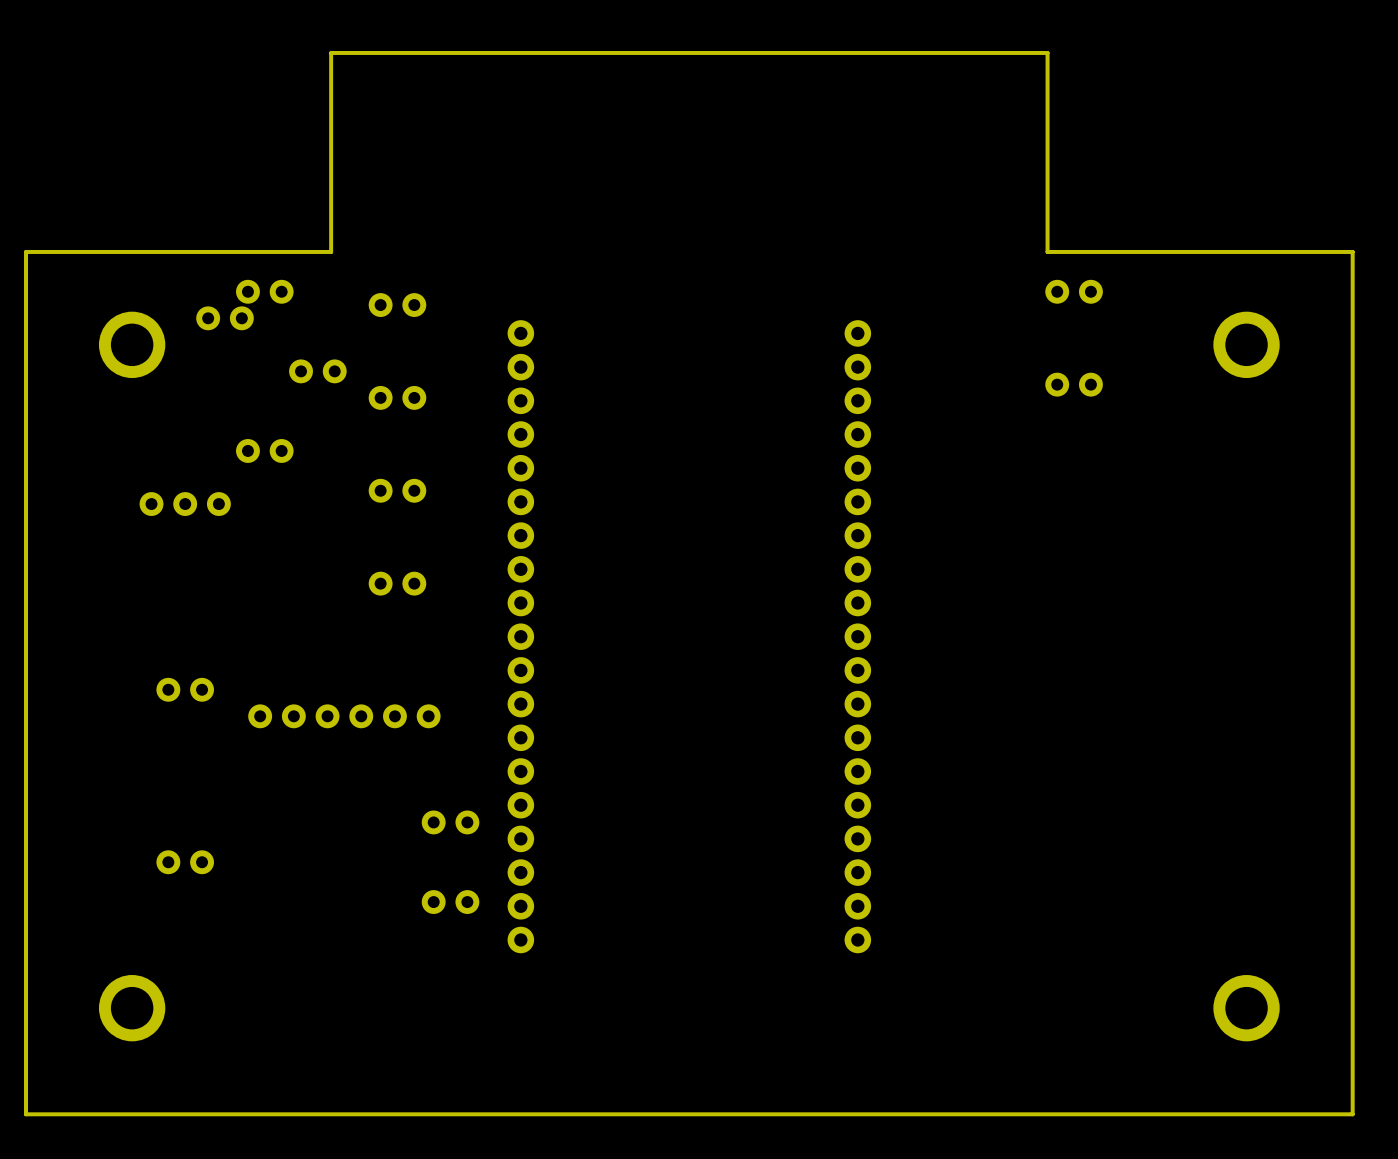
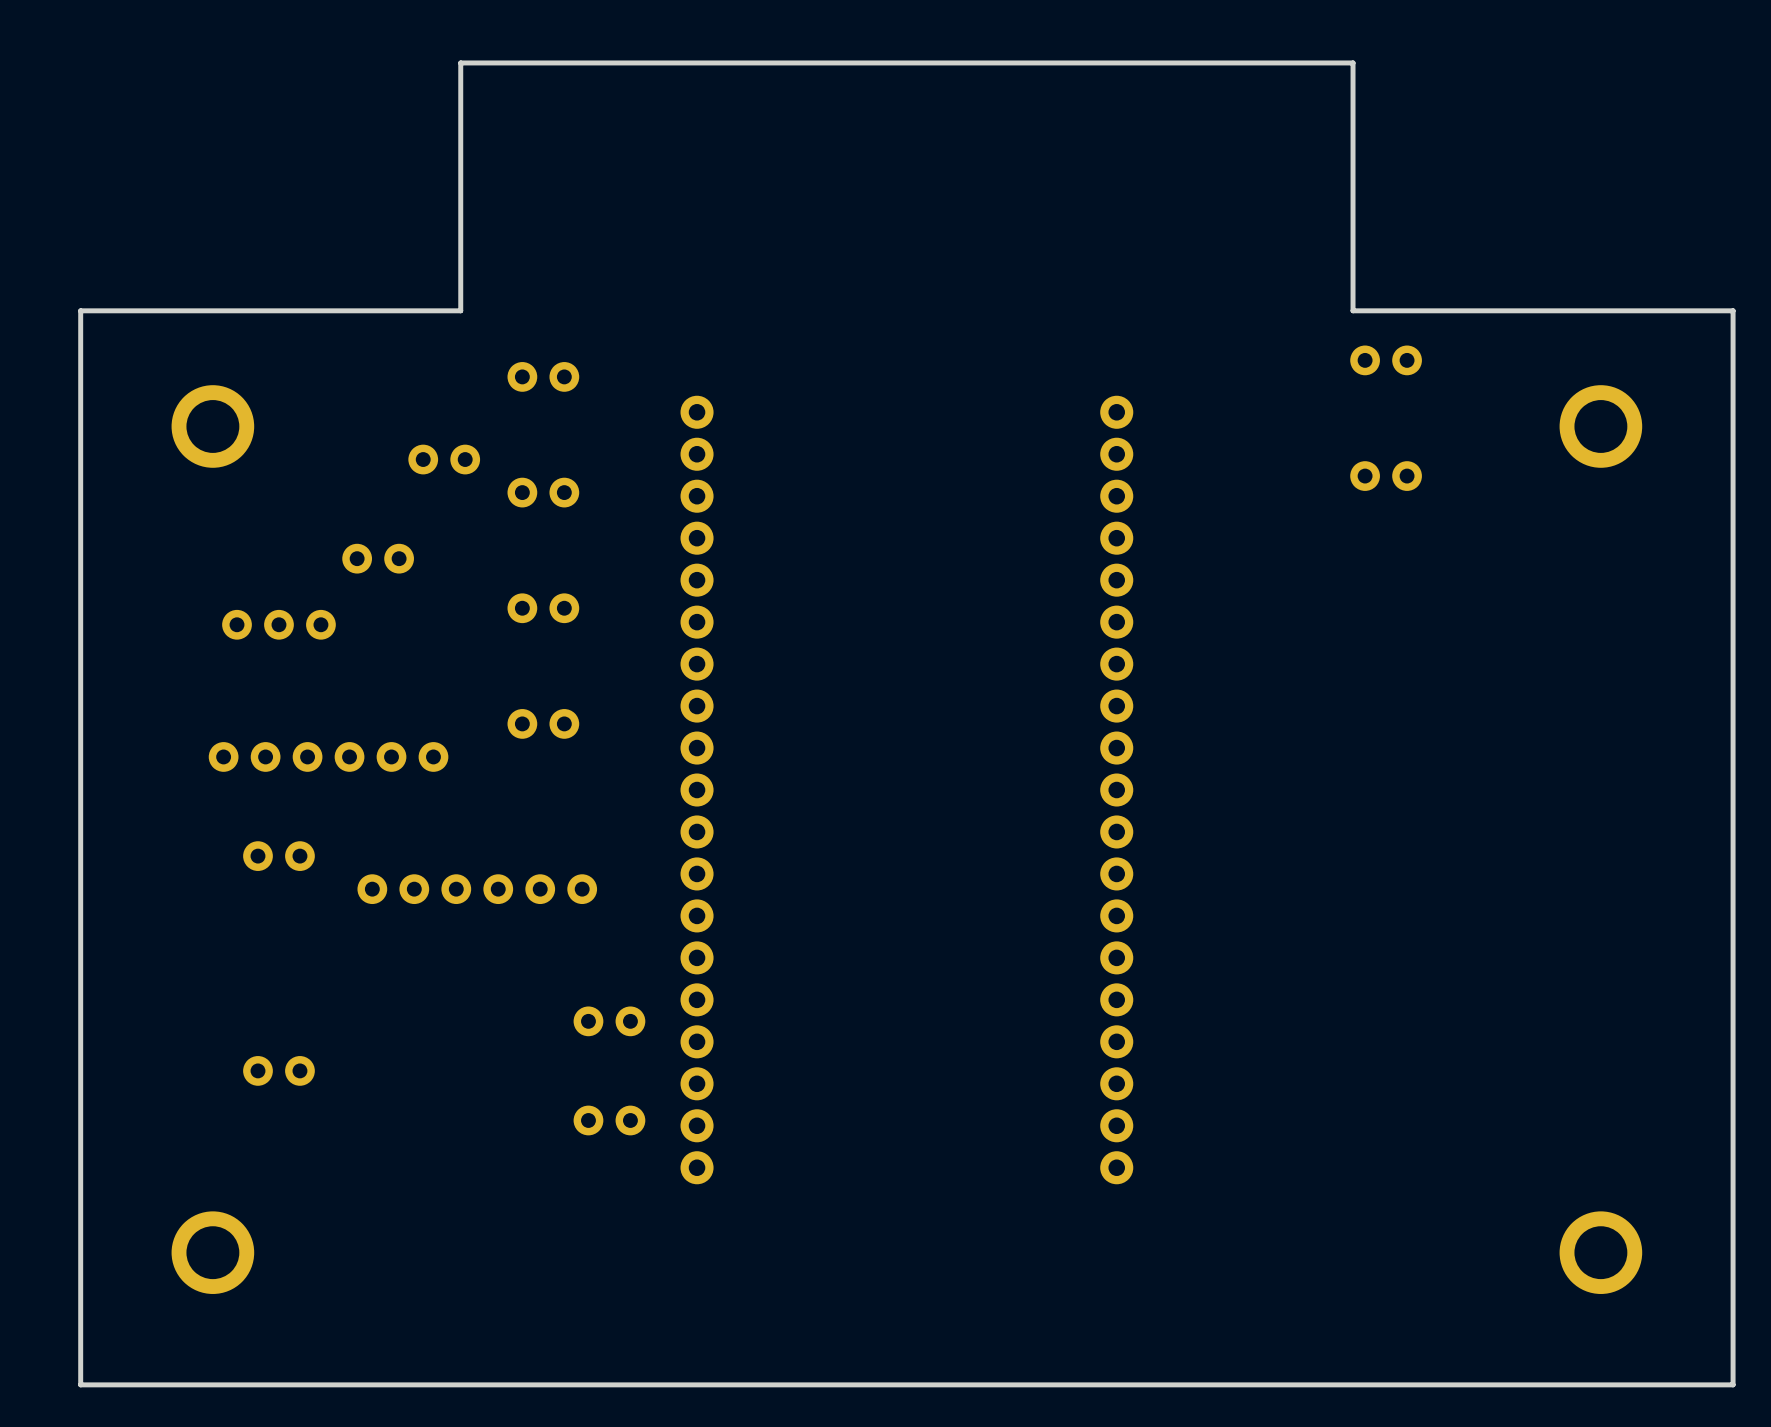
part: (264, 291) -> none
part: (225, 318) -> none
part: none -> (328, 756)

